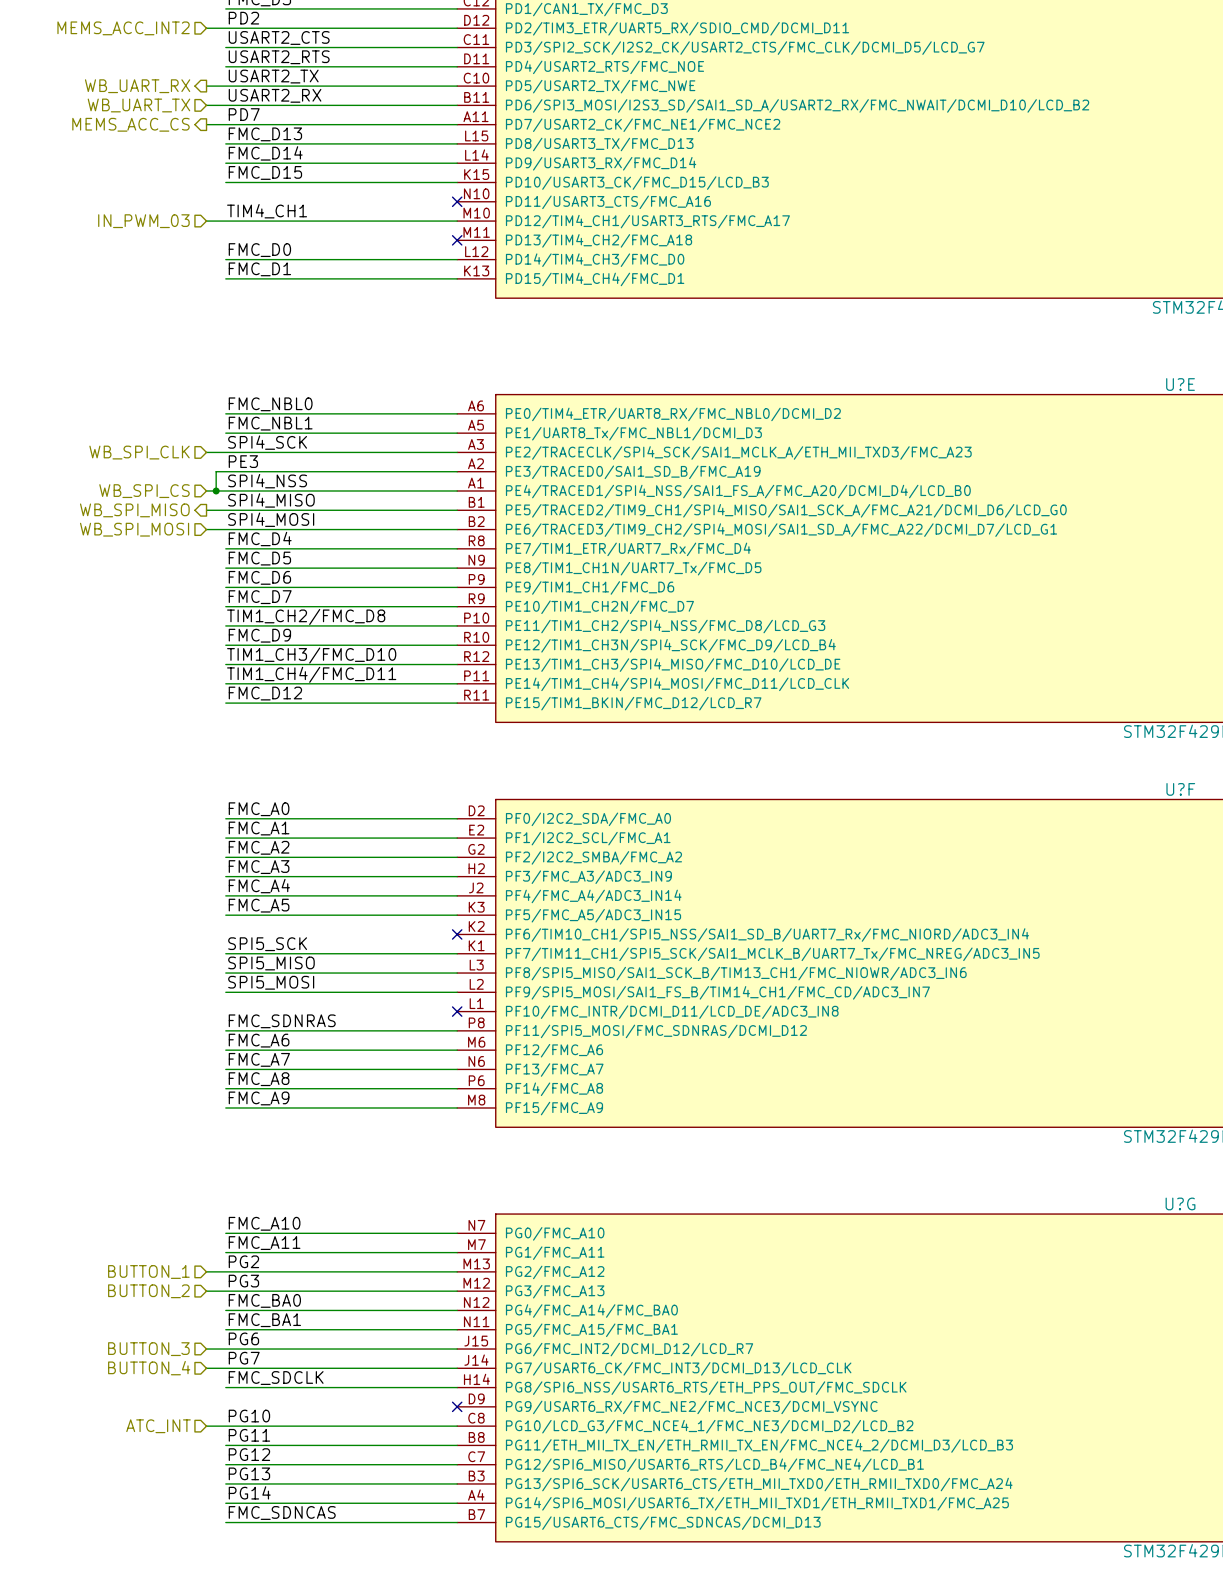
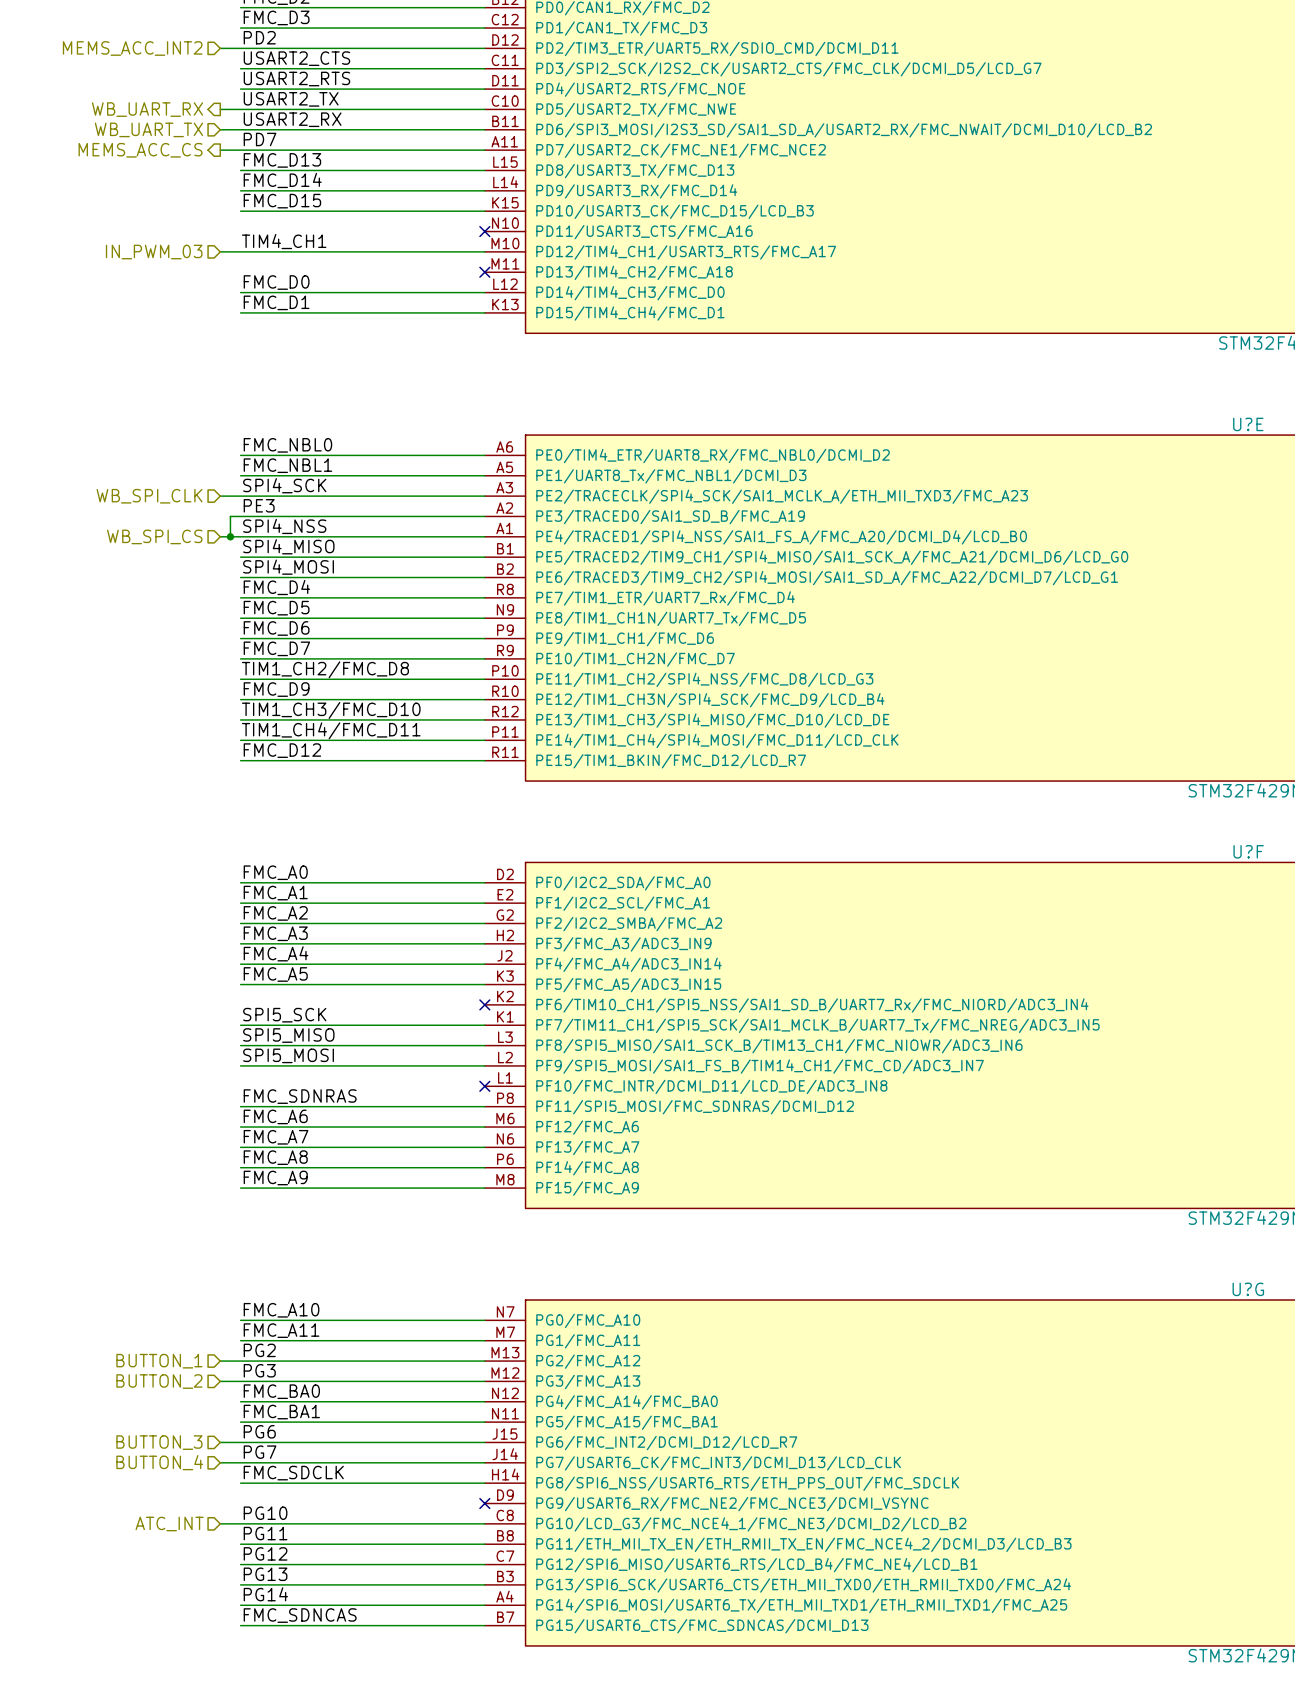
hierarchical label: WB_SPI_MISO (134, 510) -> none
wire: (206, 510) (225, 510) -> none
hierarchical label: WB_SPI_MOSI (134, 529) -> none
wire: (206, 529) (225, 529) -> none

